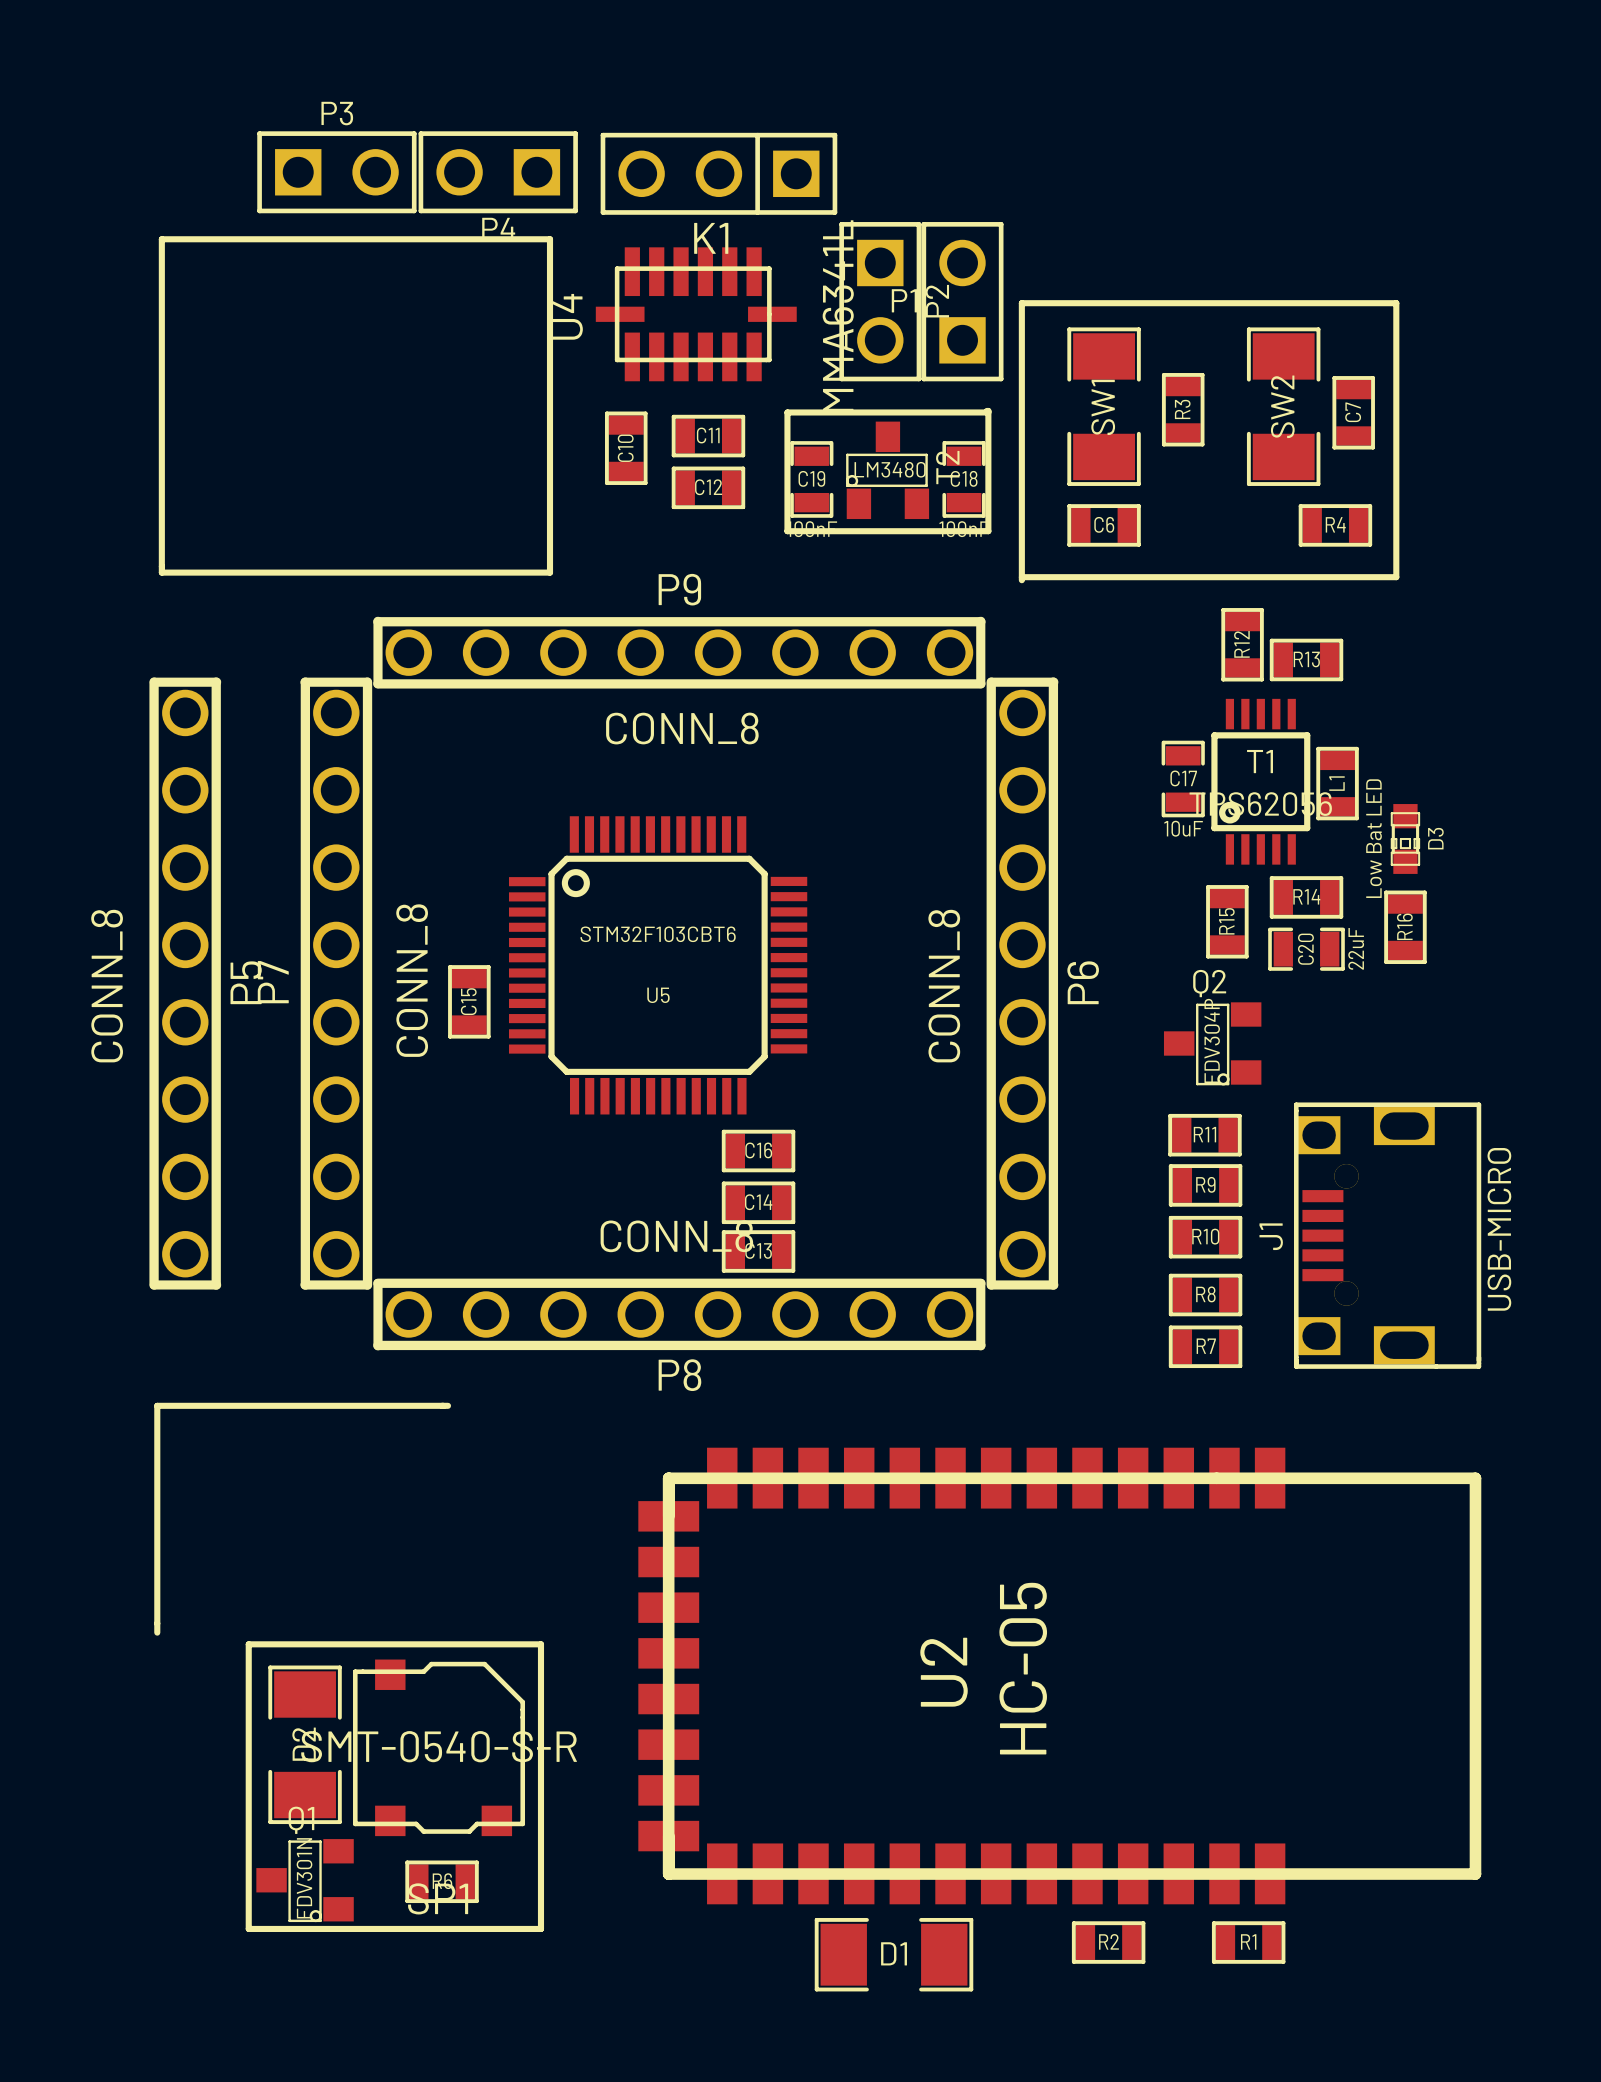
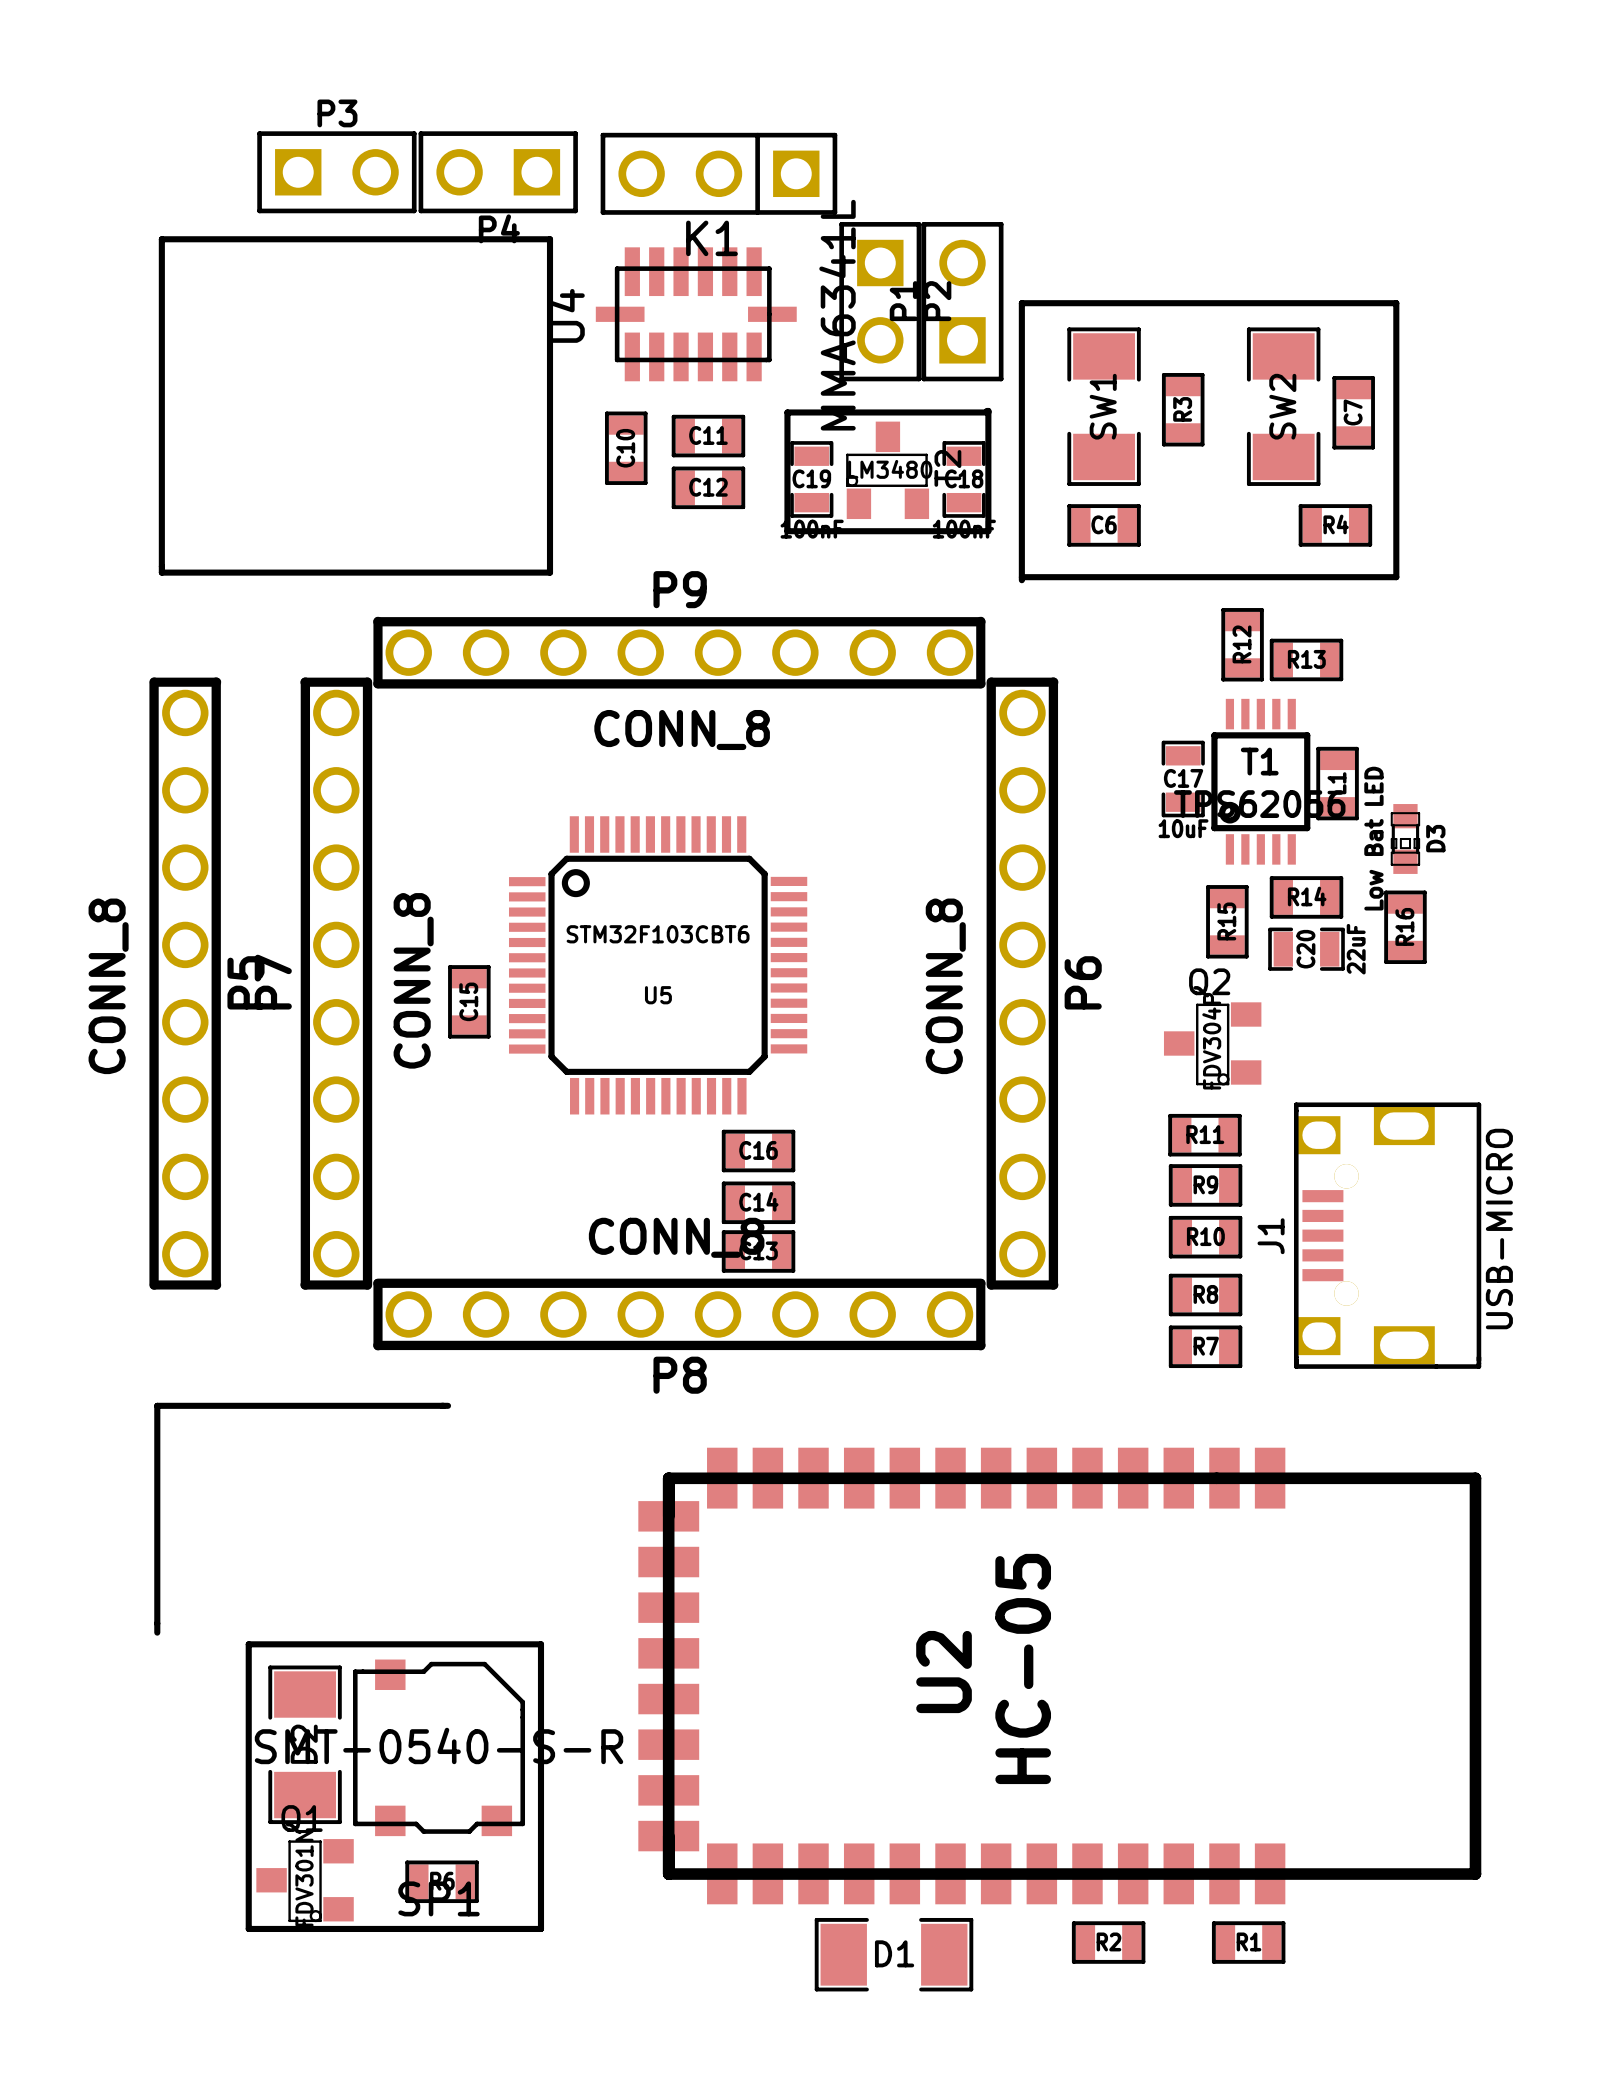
P1 name rotation: 0° (904, 300) -> 90° counterclockwise (903, 301)

